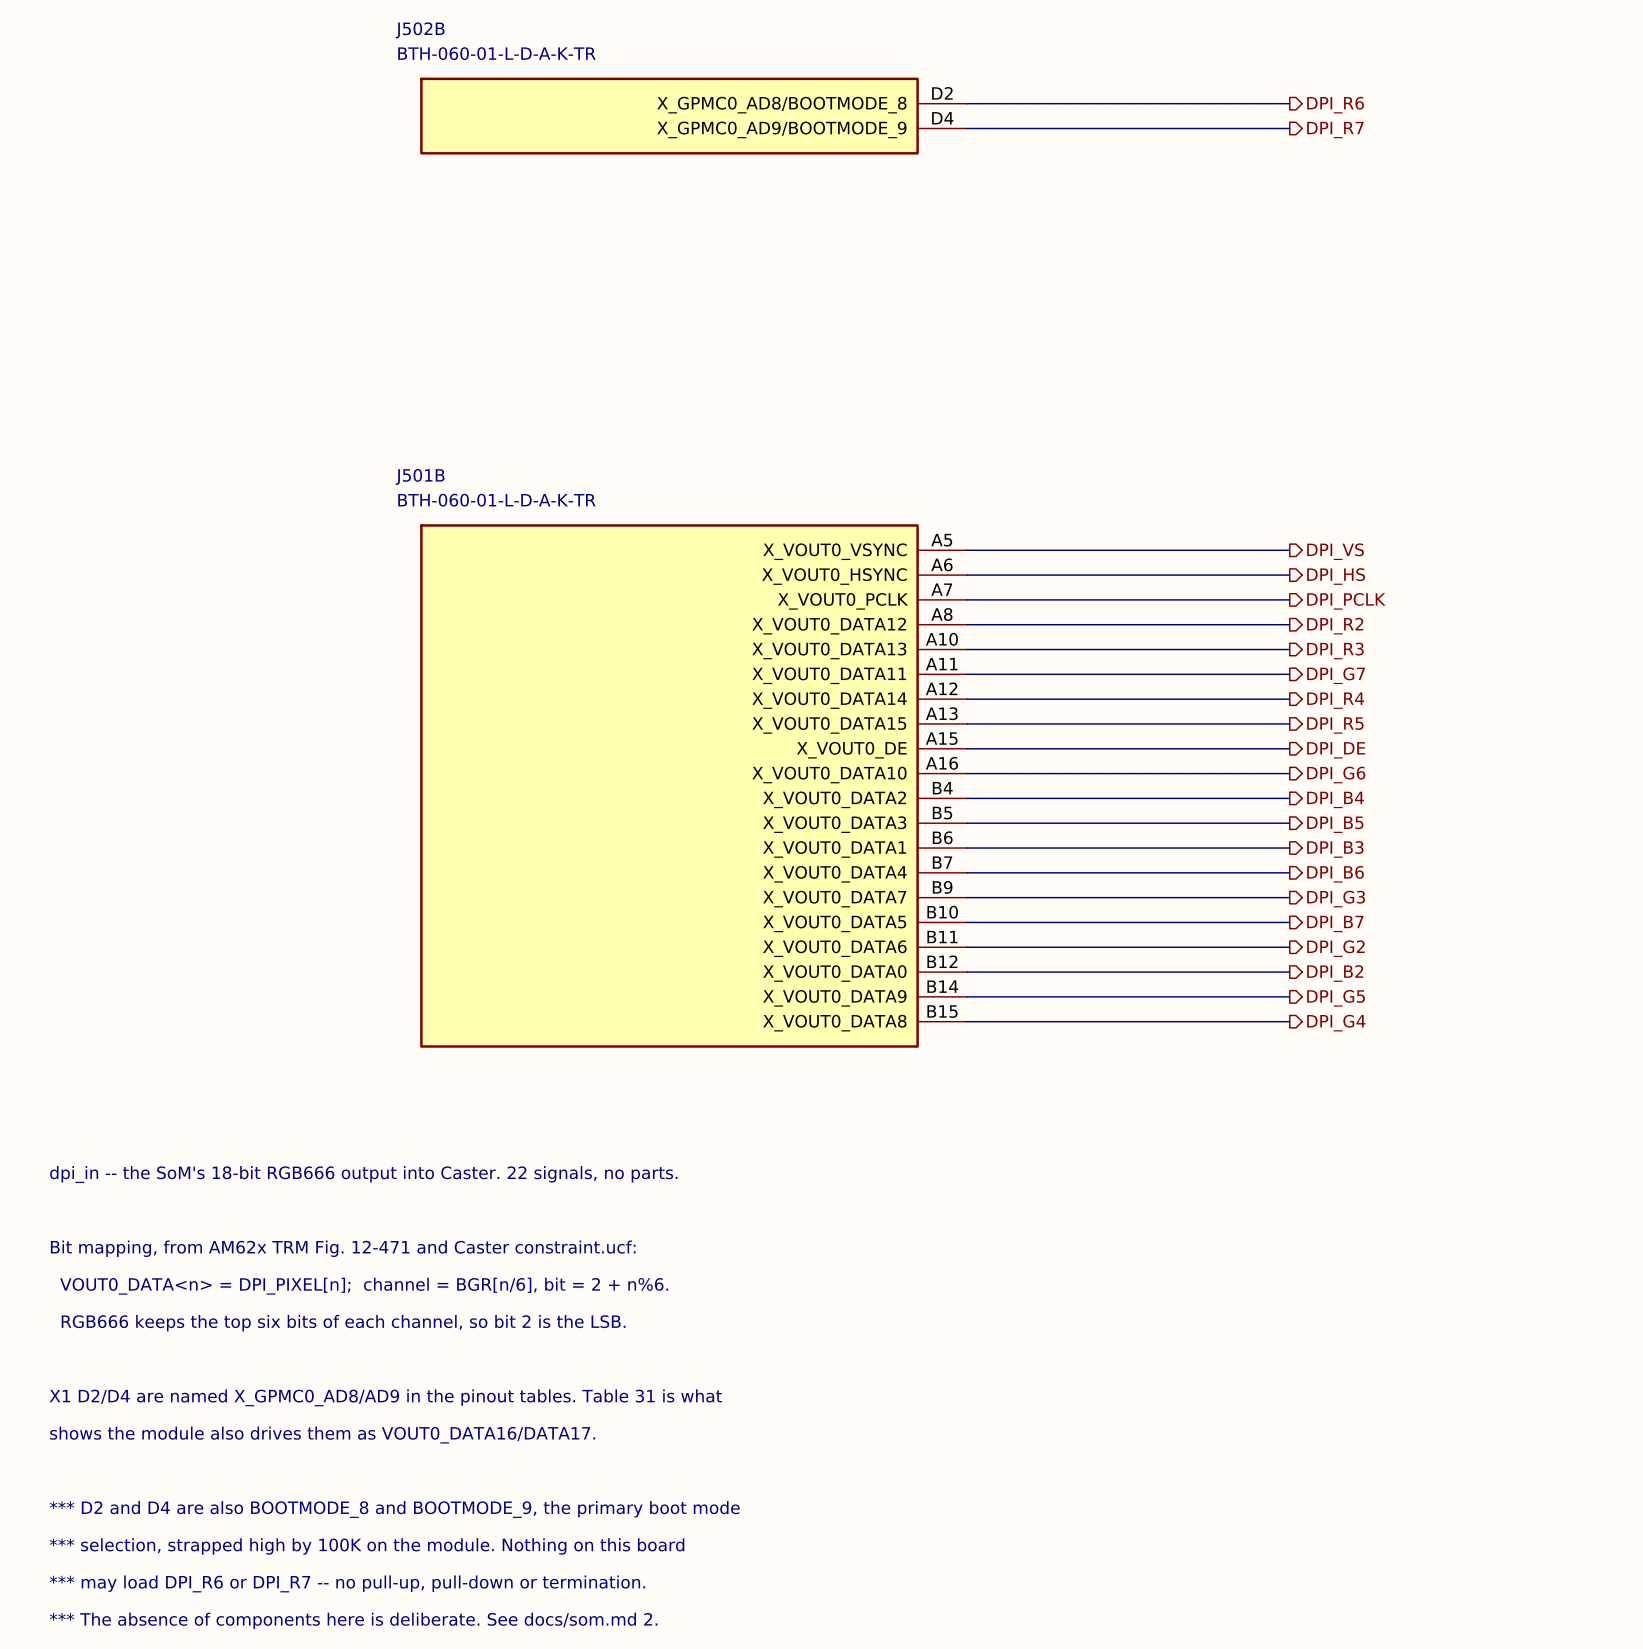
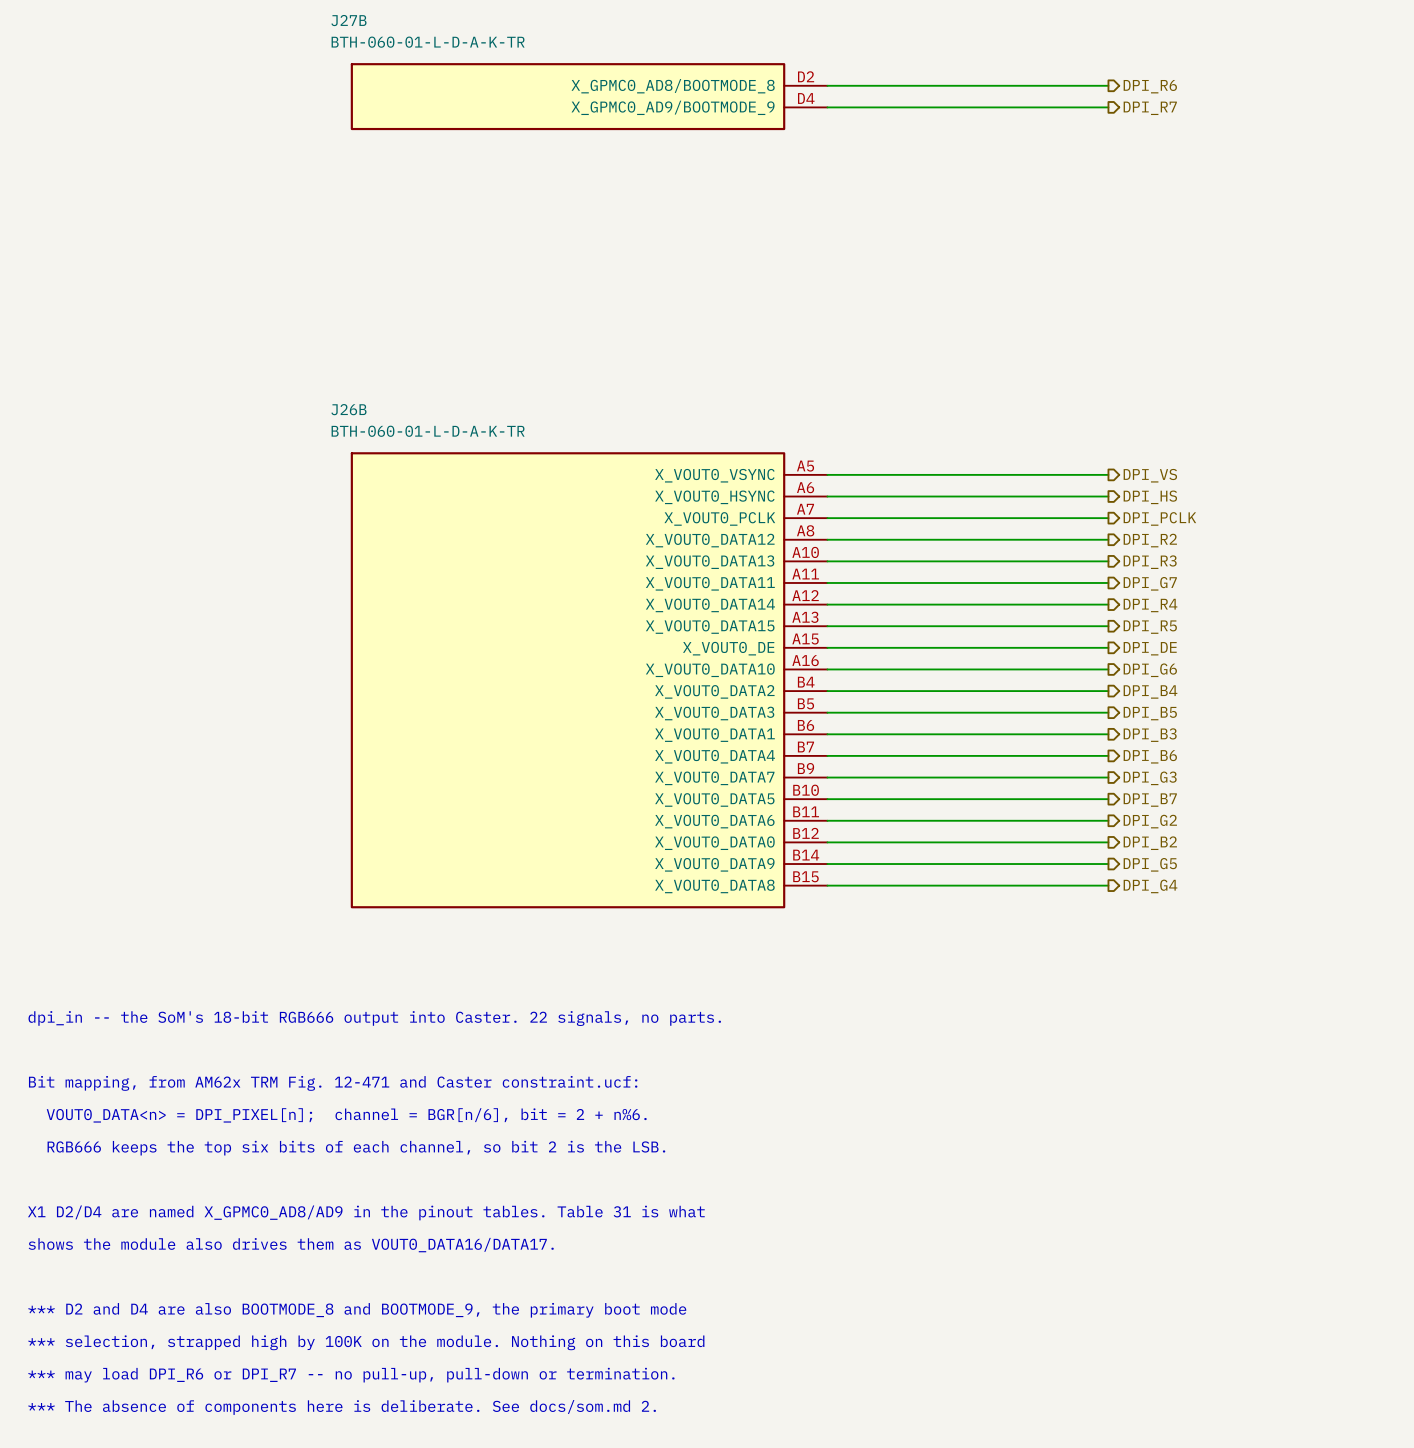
J502B name: J502B (420, 30) -> J27B (348, 20)
J501B name: J501B (420, 476) -> J26B (348, 409)

